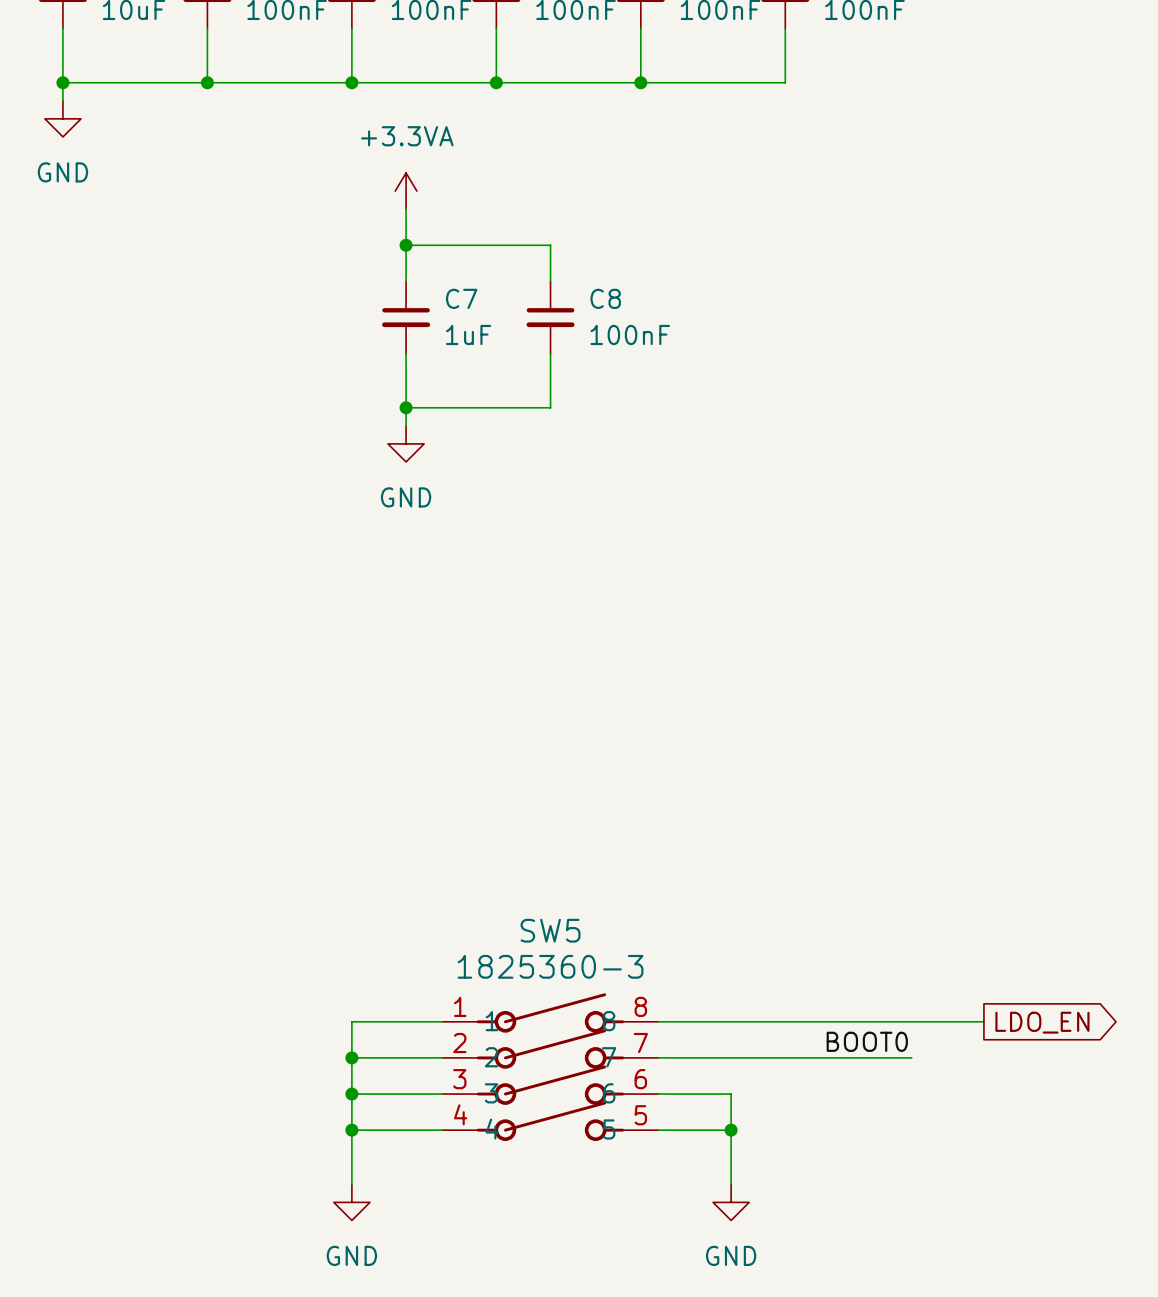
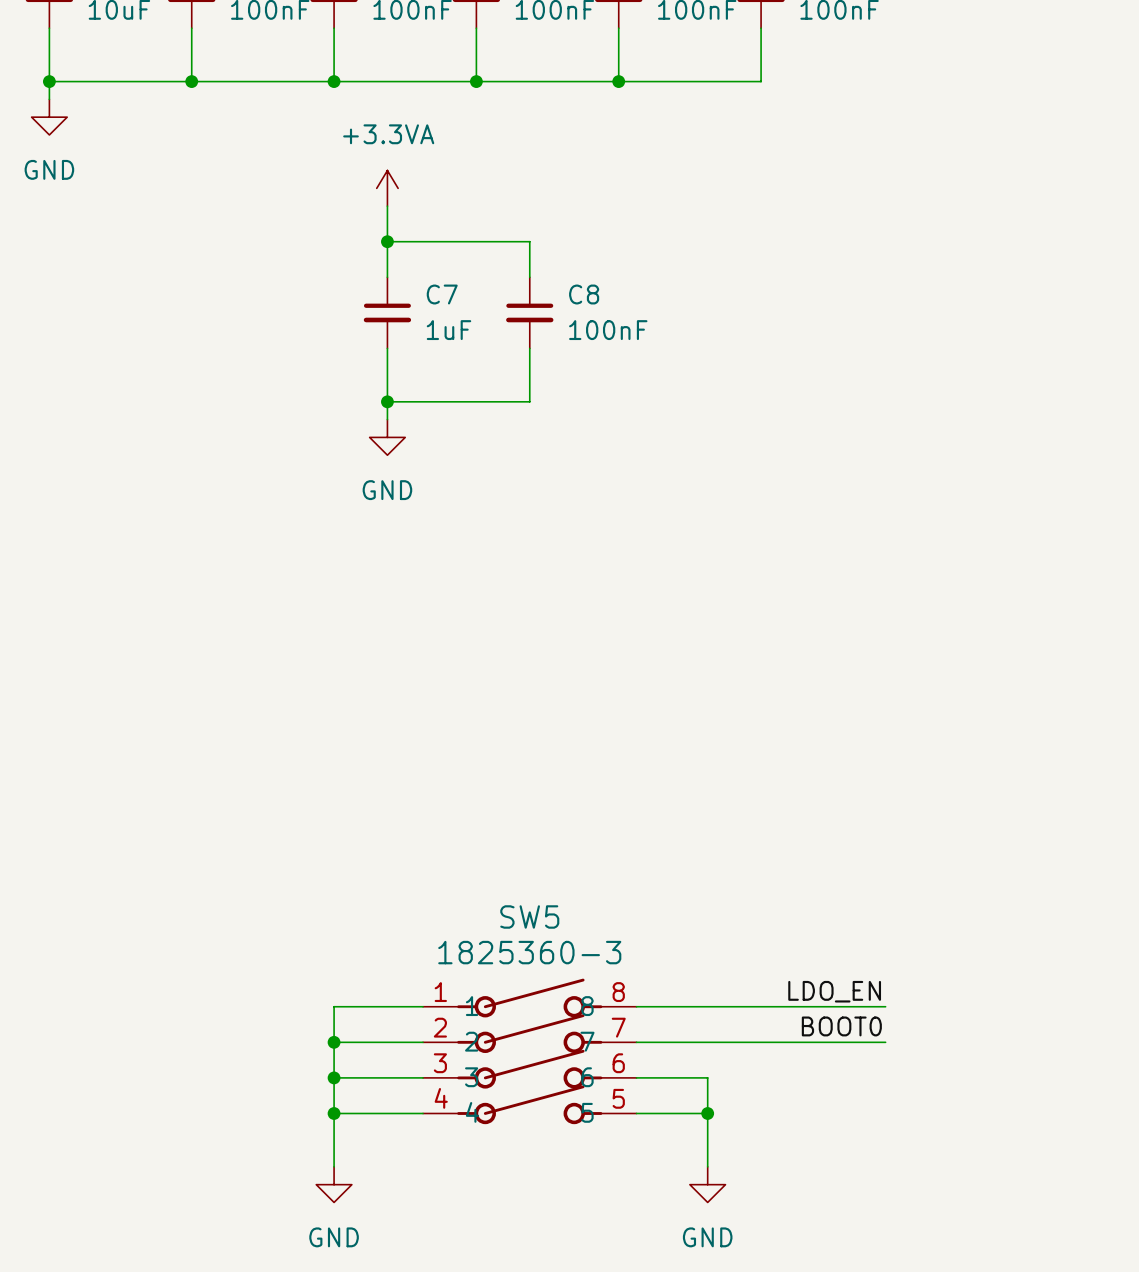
label: none -> LDO_EN (834, 991)
wire: (911, 1021) (983, 1021) -> none
global label: LDO_EN (1042, 1022) -> none

